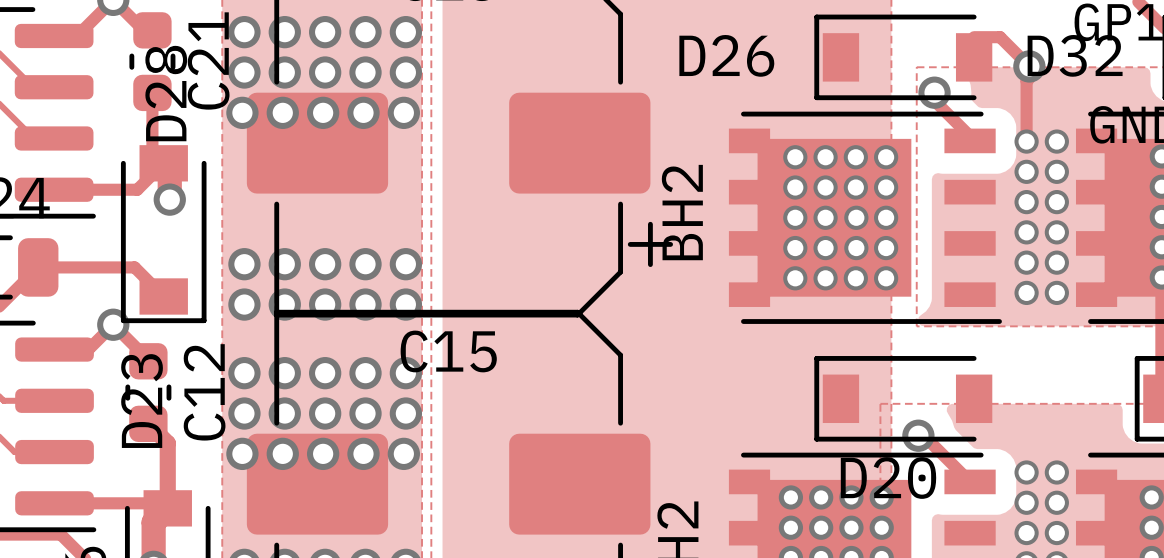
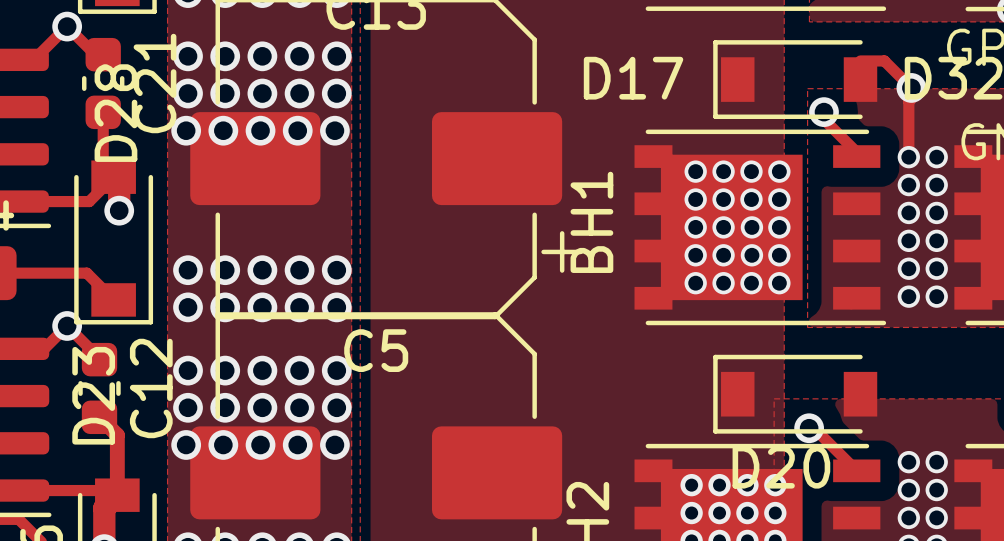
D26 name: D26 (726, 55) -> D17 (633, 78)
BH2 name: BH2 (682, 212) -> BH1 (591, 222)
C15 name: C15 (448, 351) -> C5 (376, 350)

